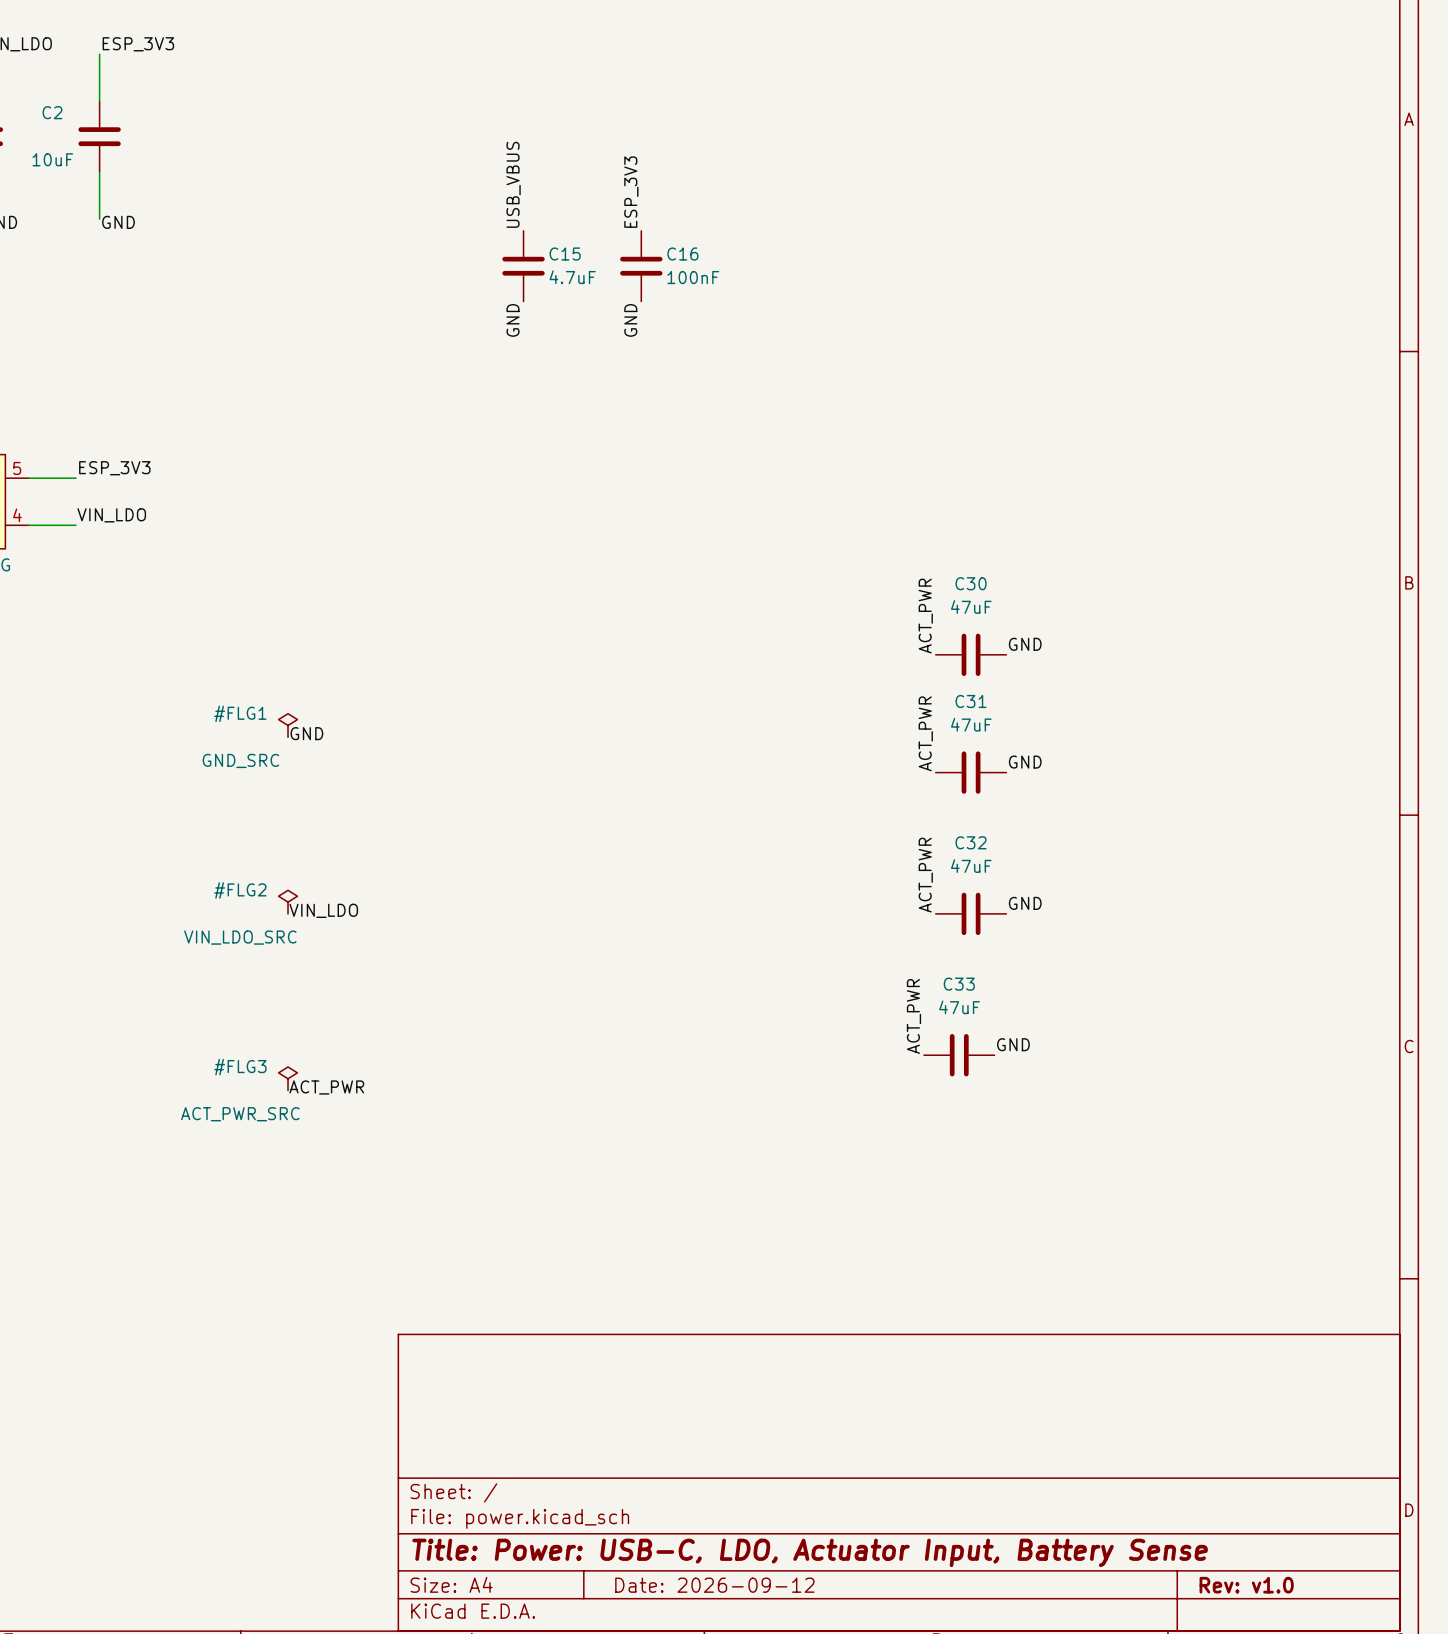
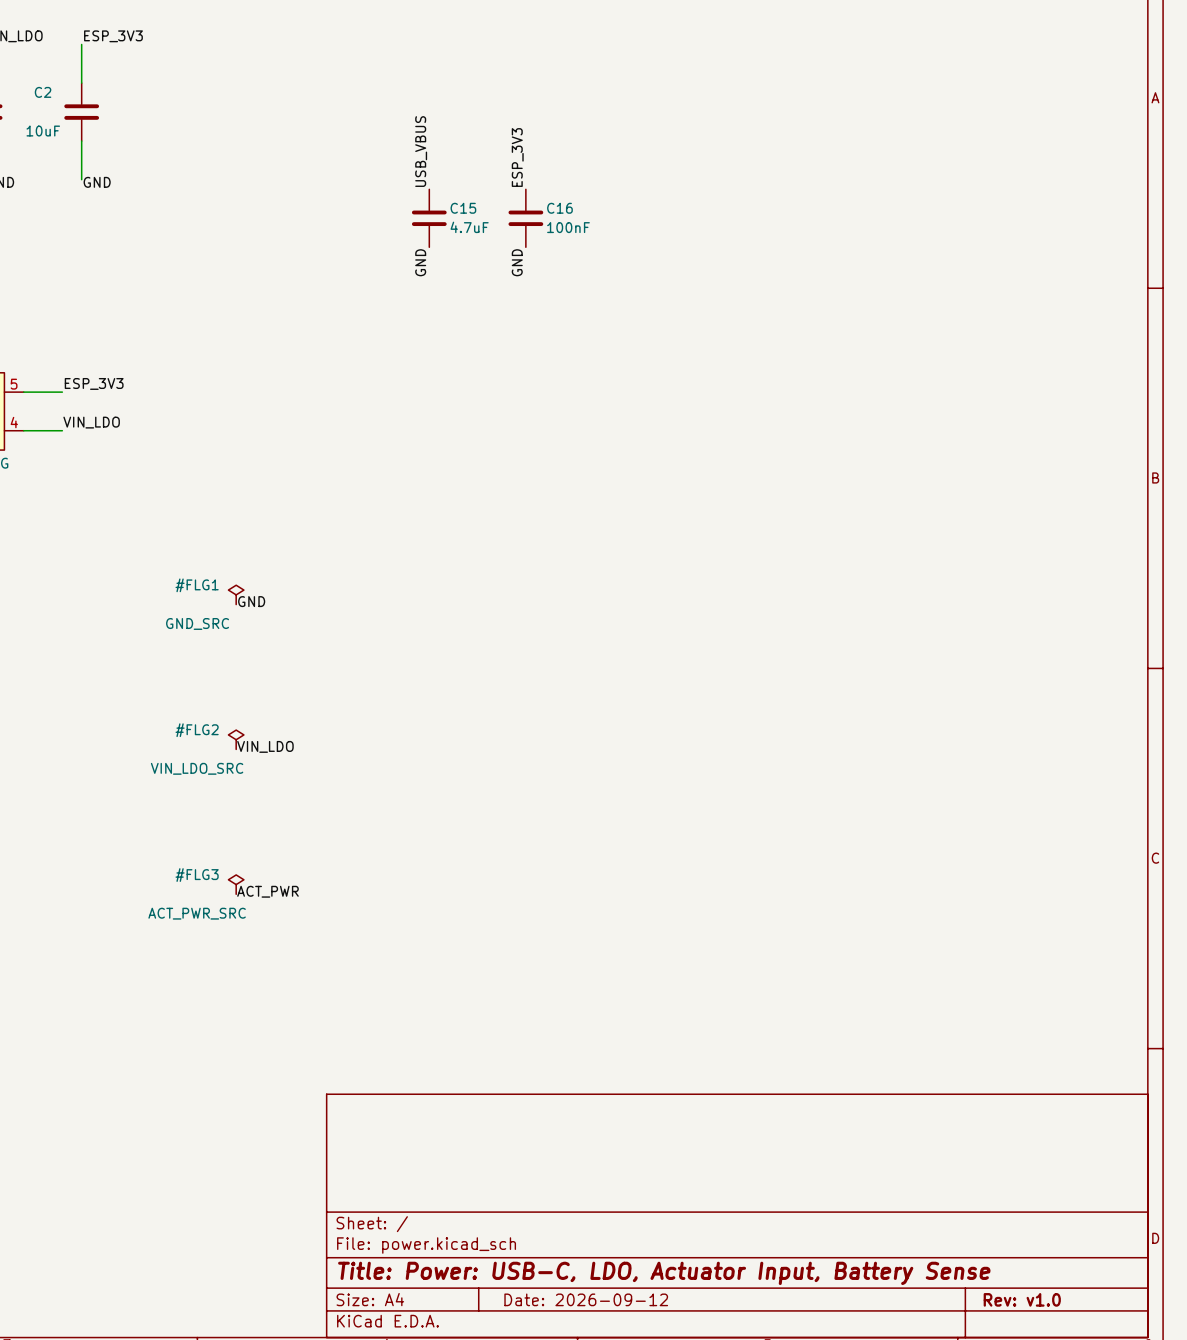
label: ACT_PWR (925, 616) -> none
label: GND (1025, 644) -> none
C30: 47uF (971, 654) -> none
label: ACT_PWR (925, 733) -> none
label: GND (1025, 762) -> none
C31: 47uF (971, 772) -> none
label: ACT_PWR (925, 875) -> none
label: GND (1025, 903) -> none
C32: 47uF (971, 913) -> none
label: ACT_PWR (913, 1016) -> none
label: GND (1013, 1044) -> none
C33: 47uF (959, 1055) -> none

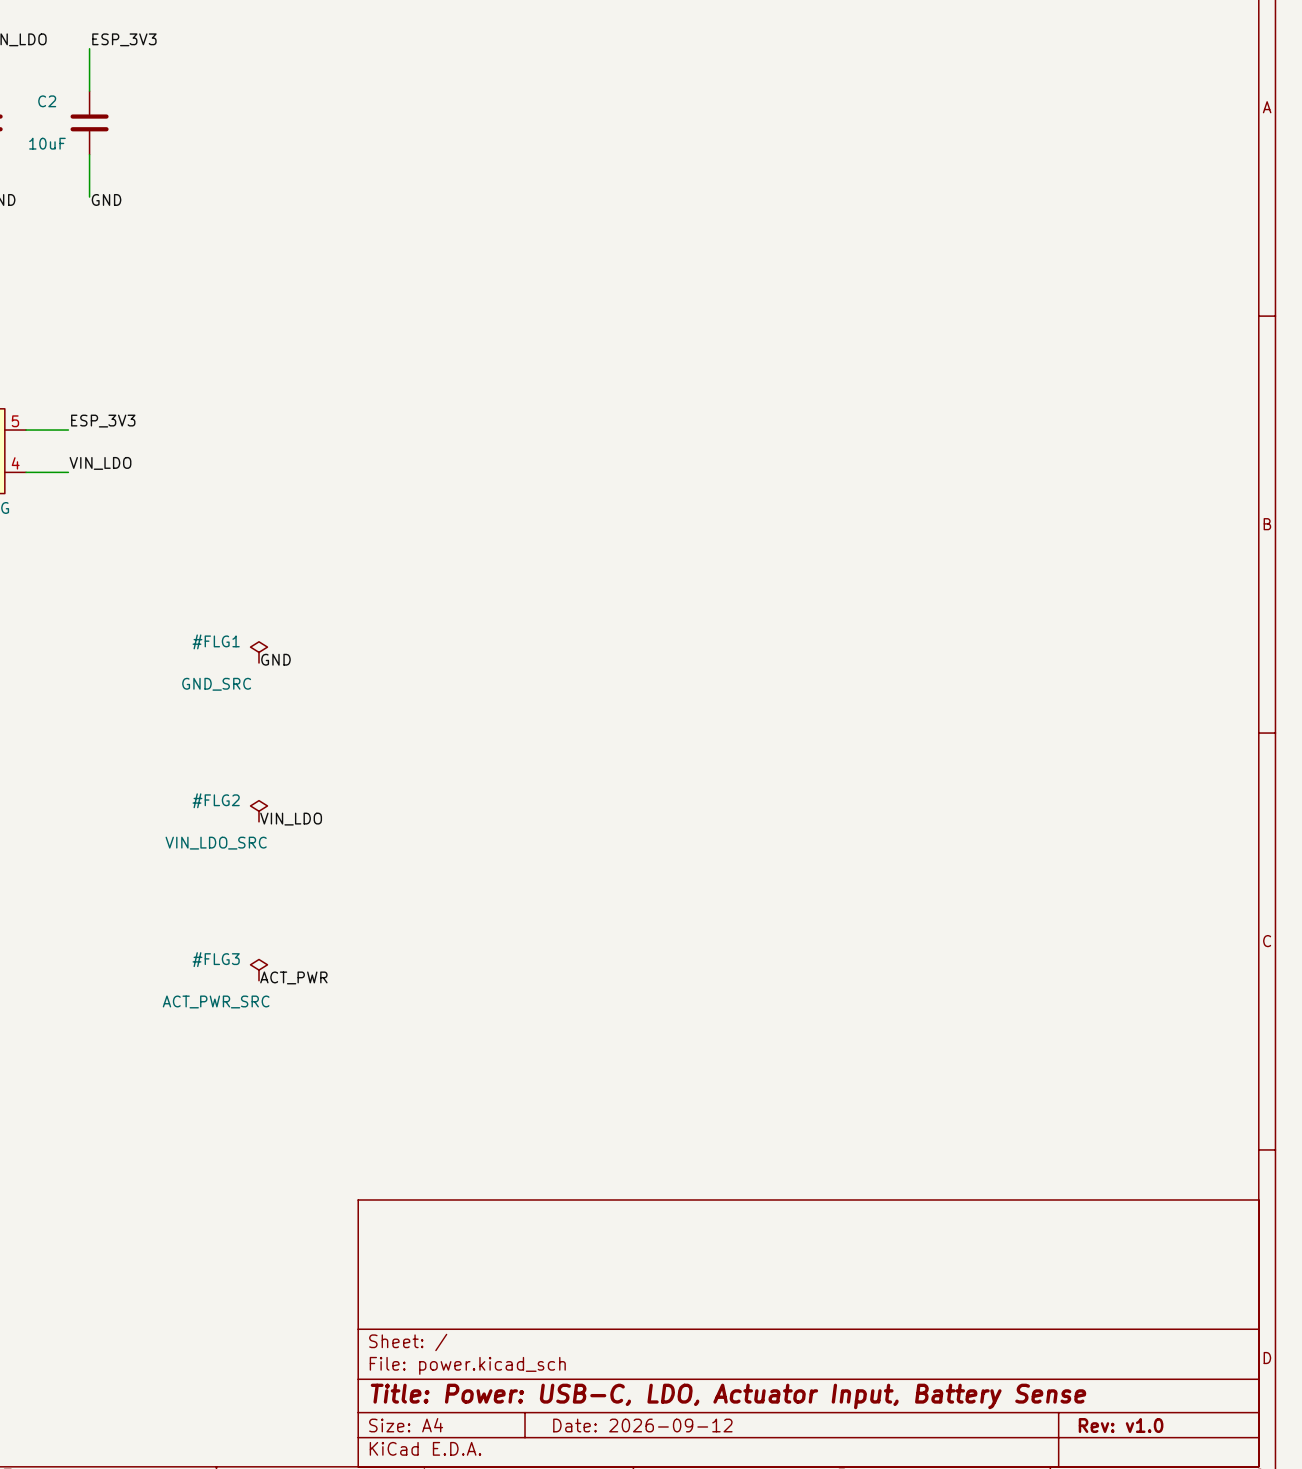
label: USB_VBUS (421, 151) -> none
label: ESP_3V3 (517, 157) -> none
C15: 4.7uF (429, 218) -> none
C16: 100nF (525, 218) -> none
label: GND (420, 262) -> none
label: GND (517, 262) -> none

